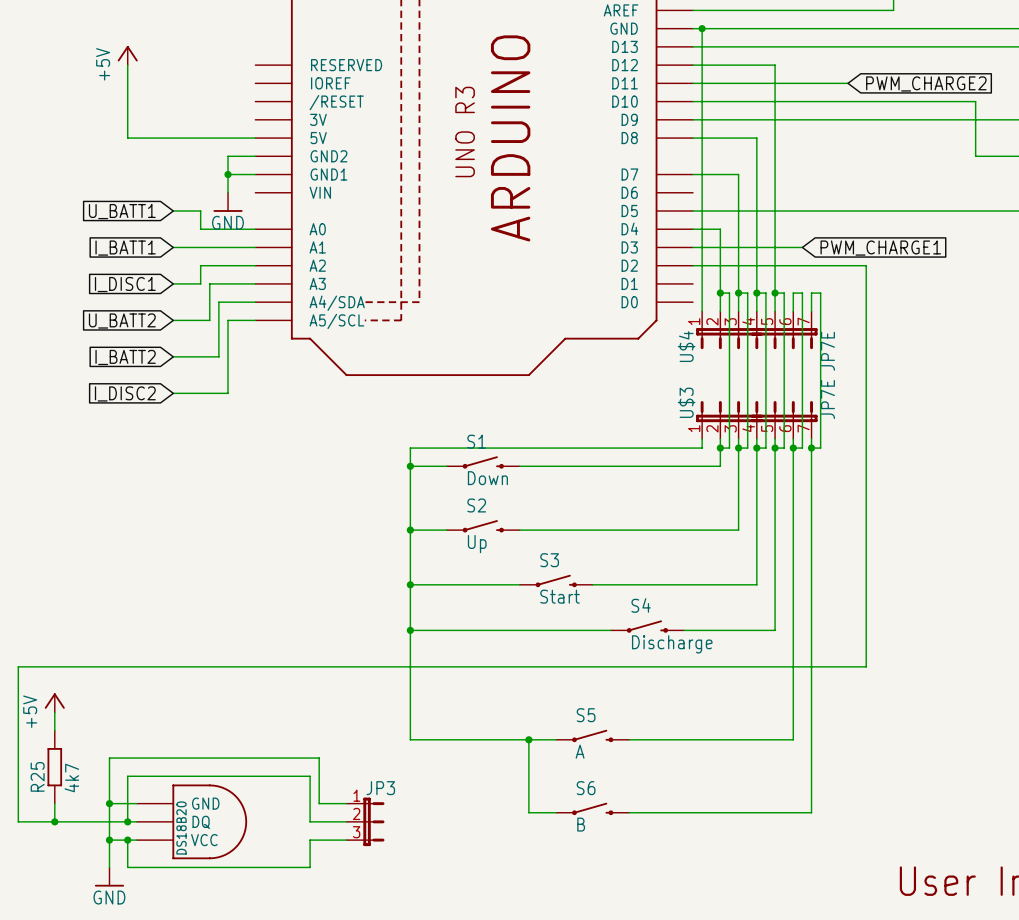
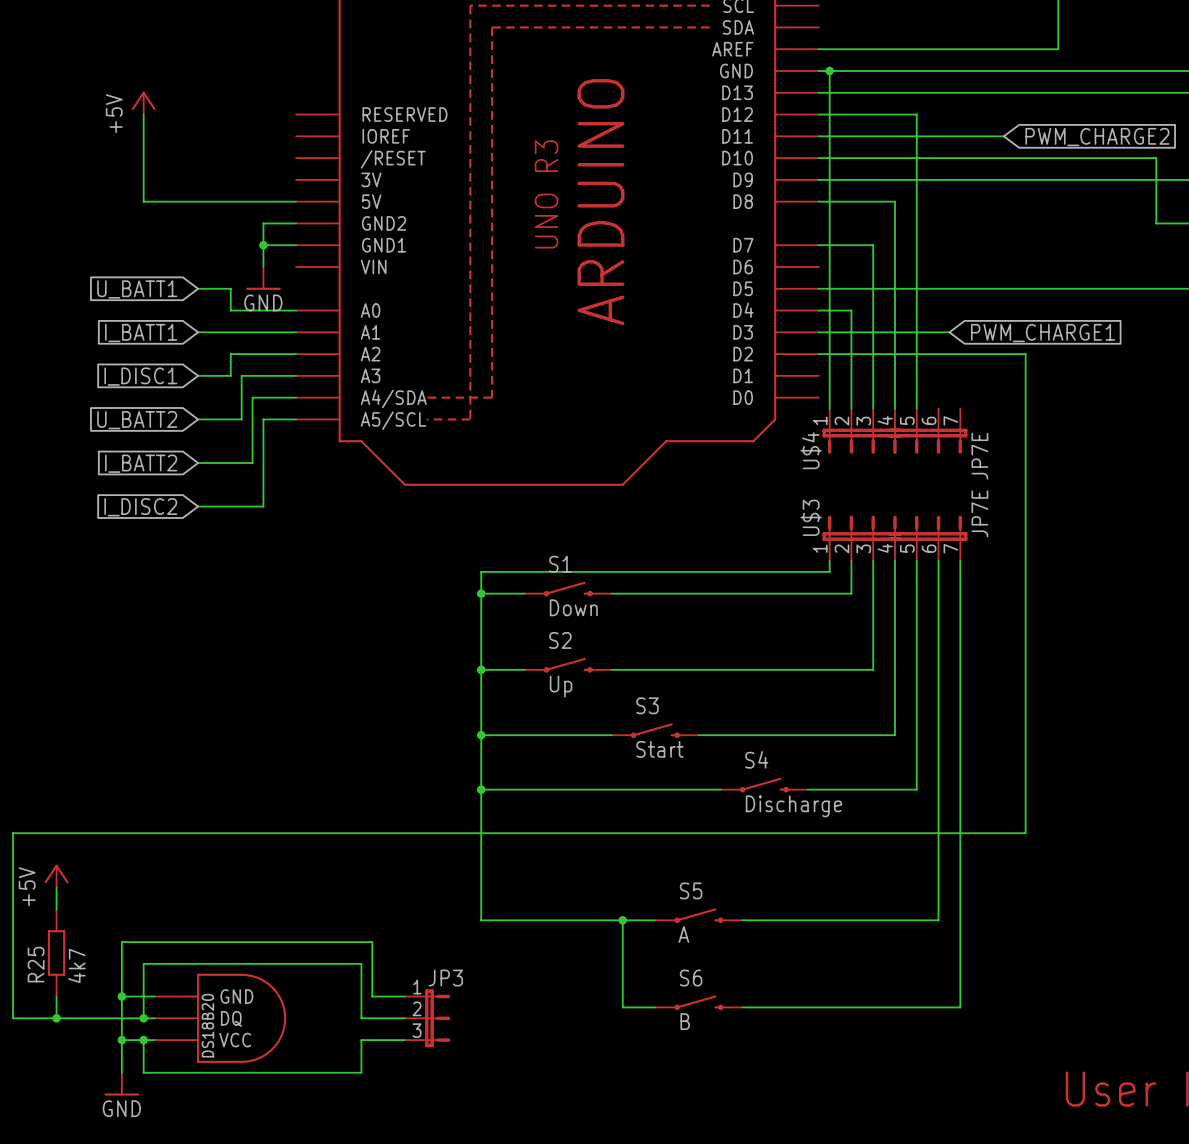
wire: (720, 293) (729, 293) (729, 448) (720, 448) -> none
junction: (720, 293) -> none
wire: (738, 293) (747, 293) (747, 448) (738, 448) -> none
junction: (738, 293) -> none
wire: (756, 293) (765, 293) (765, 448) (756, 448) -> none
junction: (756, 293) -> none
wire: (775, 293) (784, 293) (784, 448) (775, 448) -> none
junction: (775, 293) -> none
wire: (793, 311) (793, 293) (802, 293) (802, 448) (793, 448) -> none
wire: (811, 311) (811, 293) (820, 293) (820, 448) (811, 448) -> none
junction: (720, 448) -> none
junction: (738, 448) -> none
junction: (756, 448) -> none
junction: (775, 448) -> none
junction: (793, 448) -> none
junction: (811, 448) -> none

